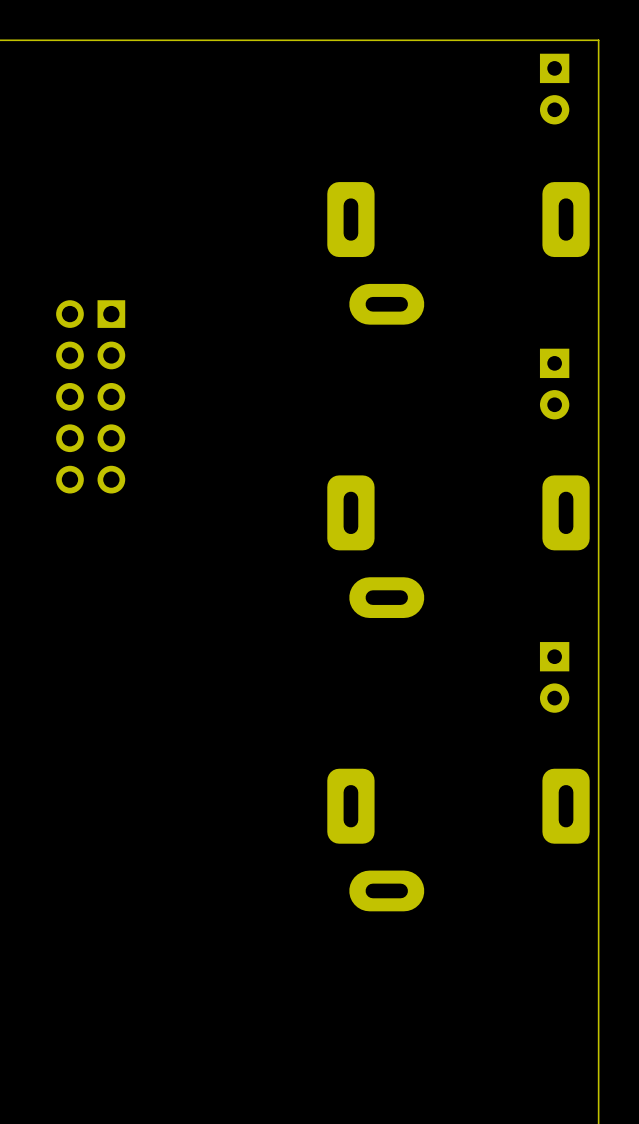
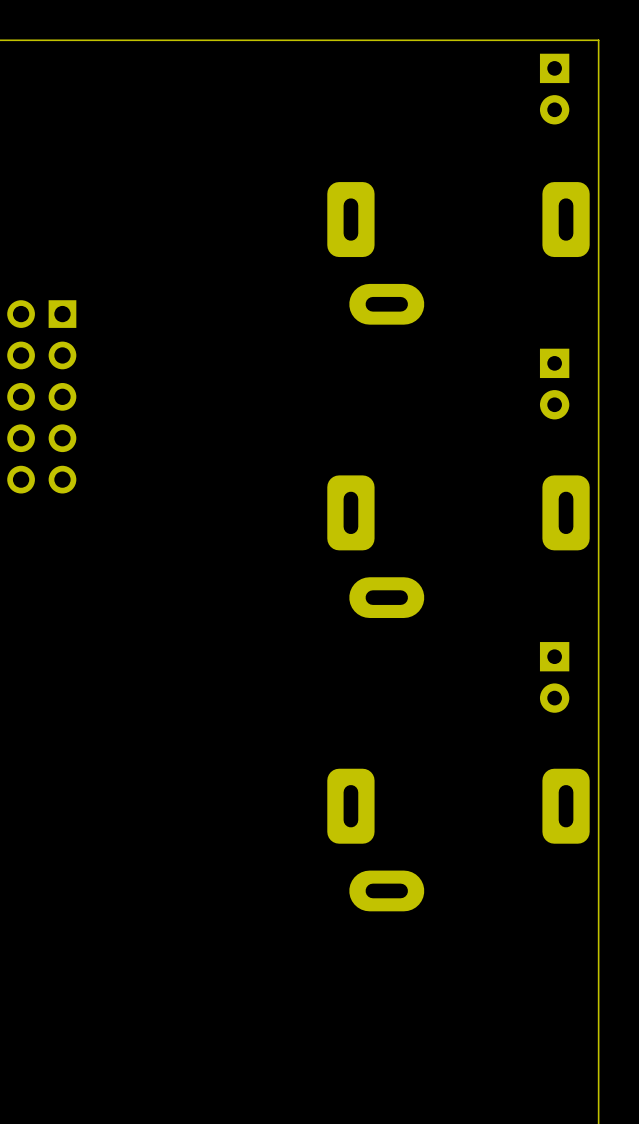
part position: (90, 396) -> (41, 396)

